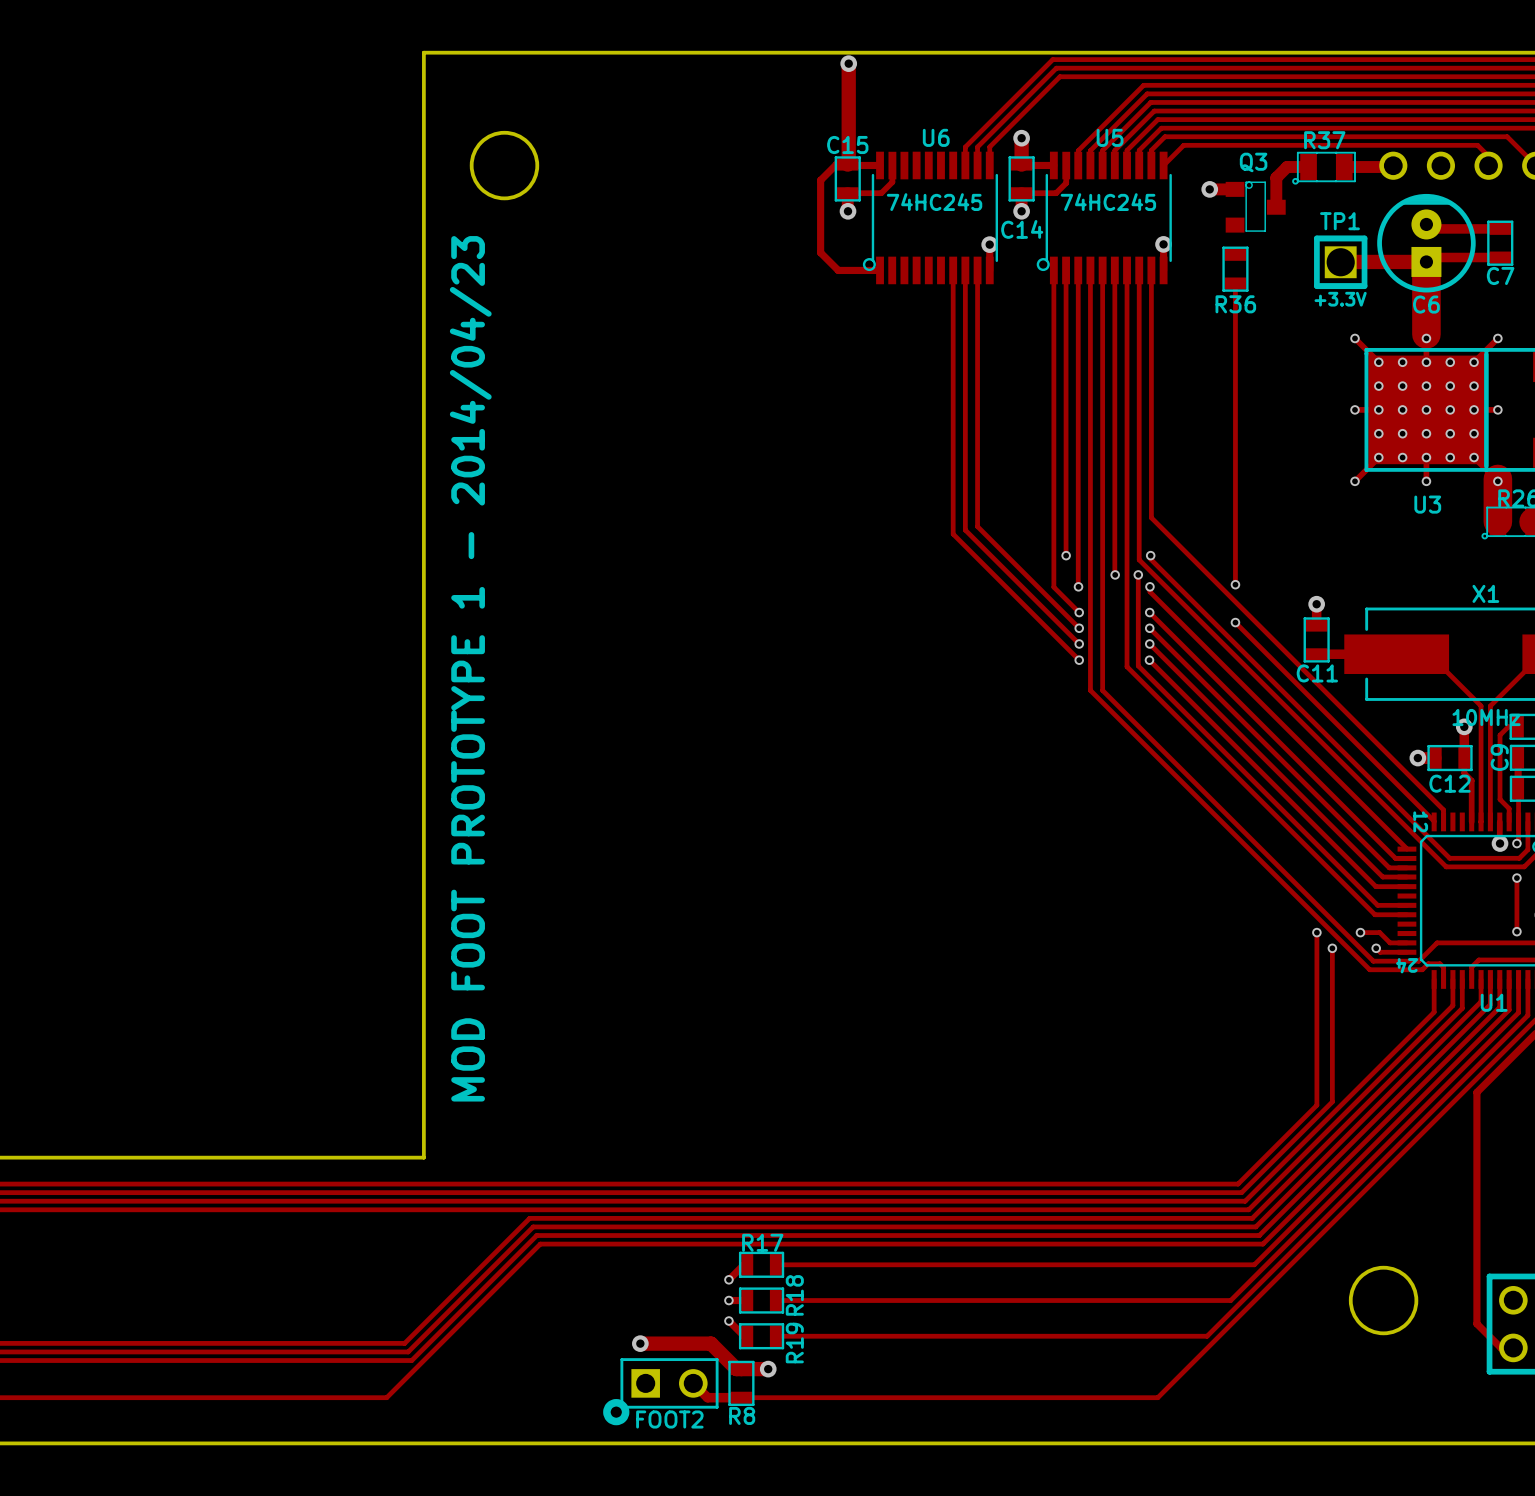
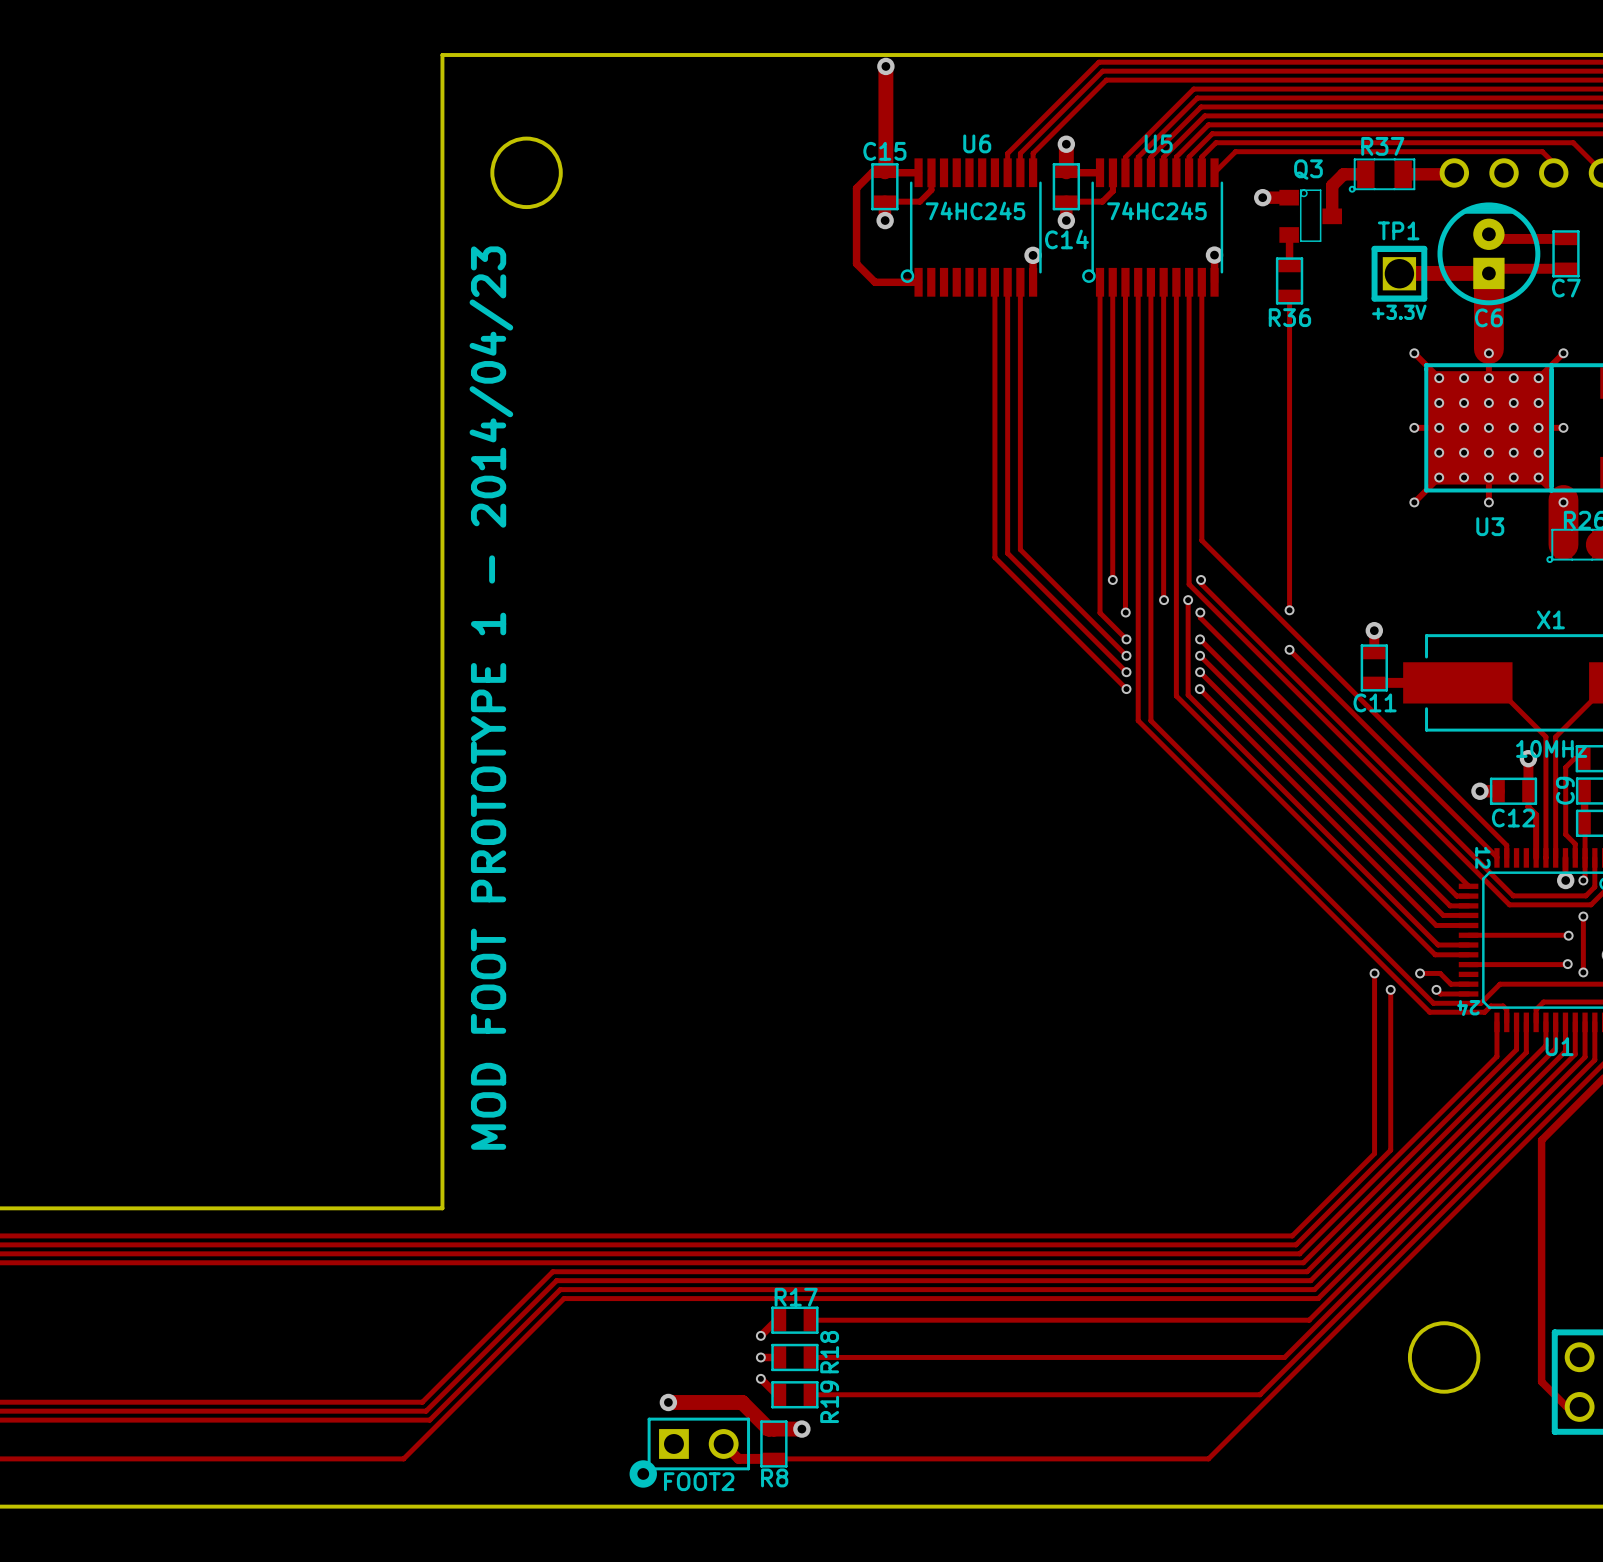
track: none -> (1289, 235) (1289, 266)
track: none -> (1468, 935) (1568, 935)
via: none -> (1568, 935)
track: none -> (1567, 964) (1468, 964)
via: none -> (1567, 964)

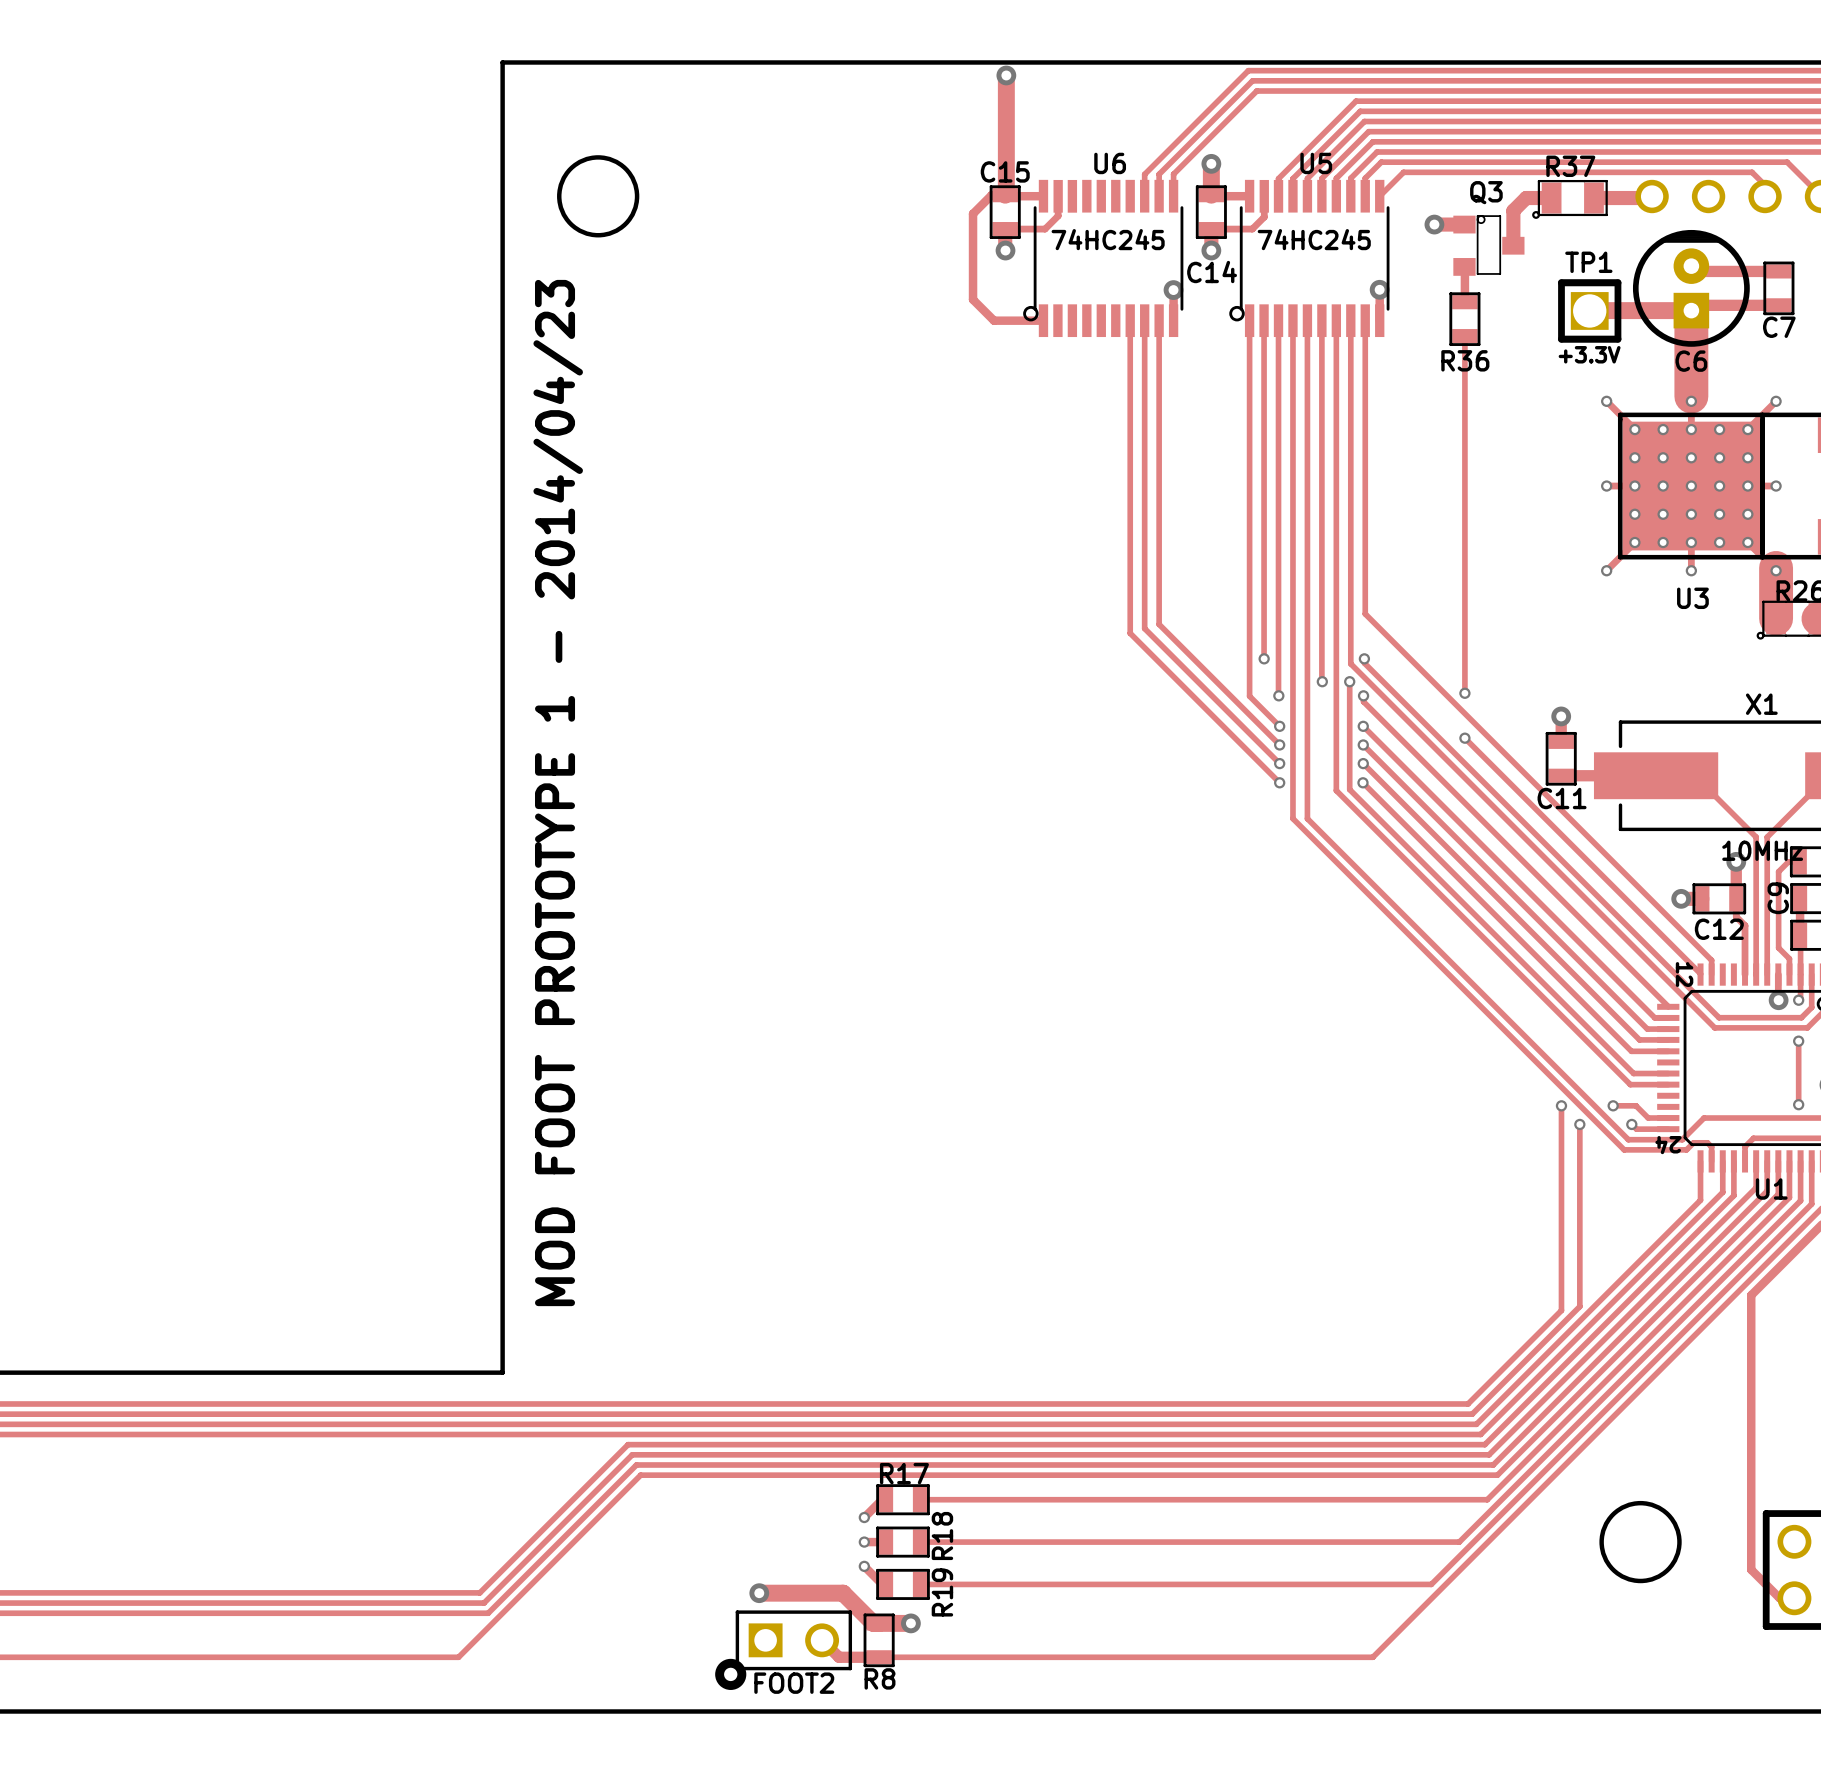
track: (1468, 935) (1568, 935) -> none
via: (1568, 935) -> none
track: (1567, 964) (1468, 964) -> none
via: (1567, 964) -> none

